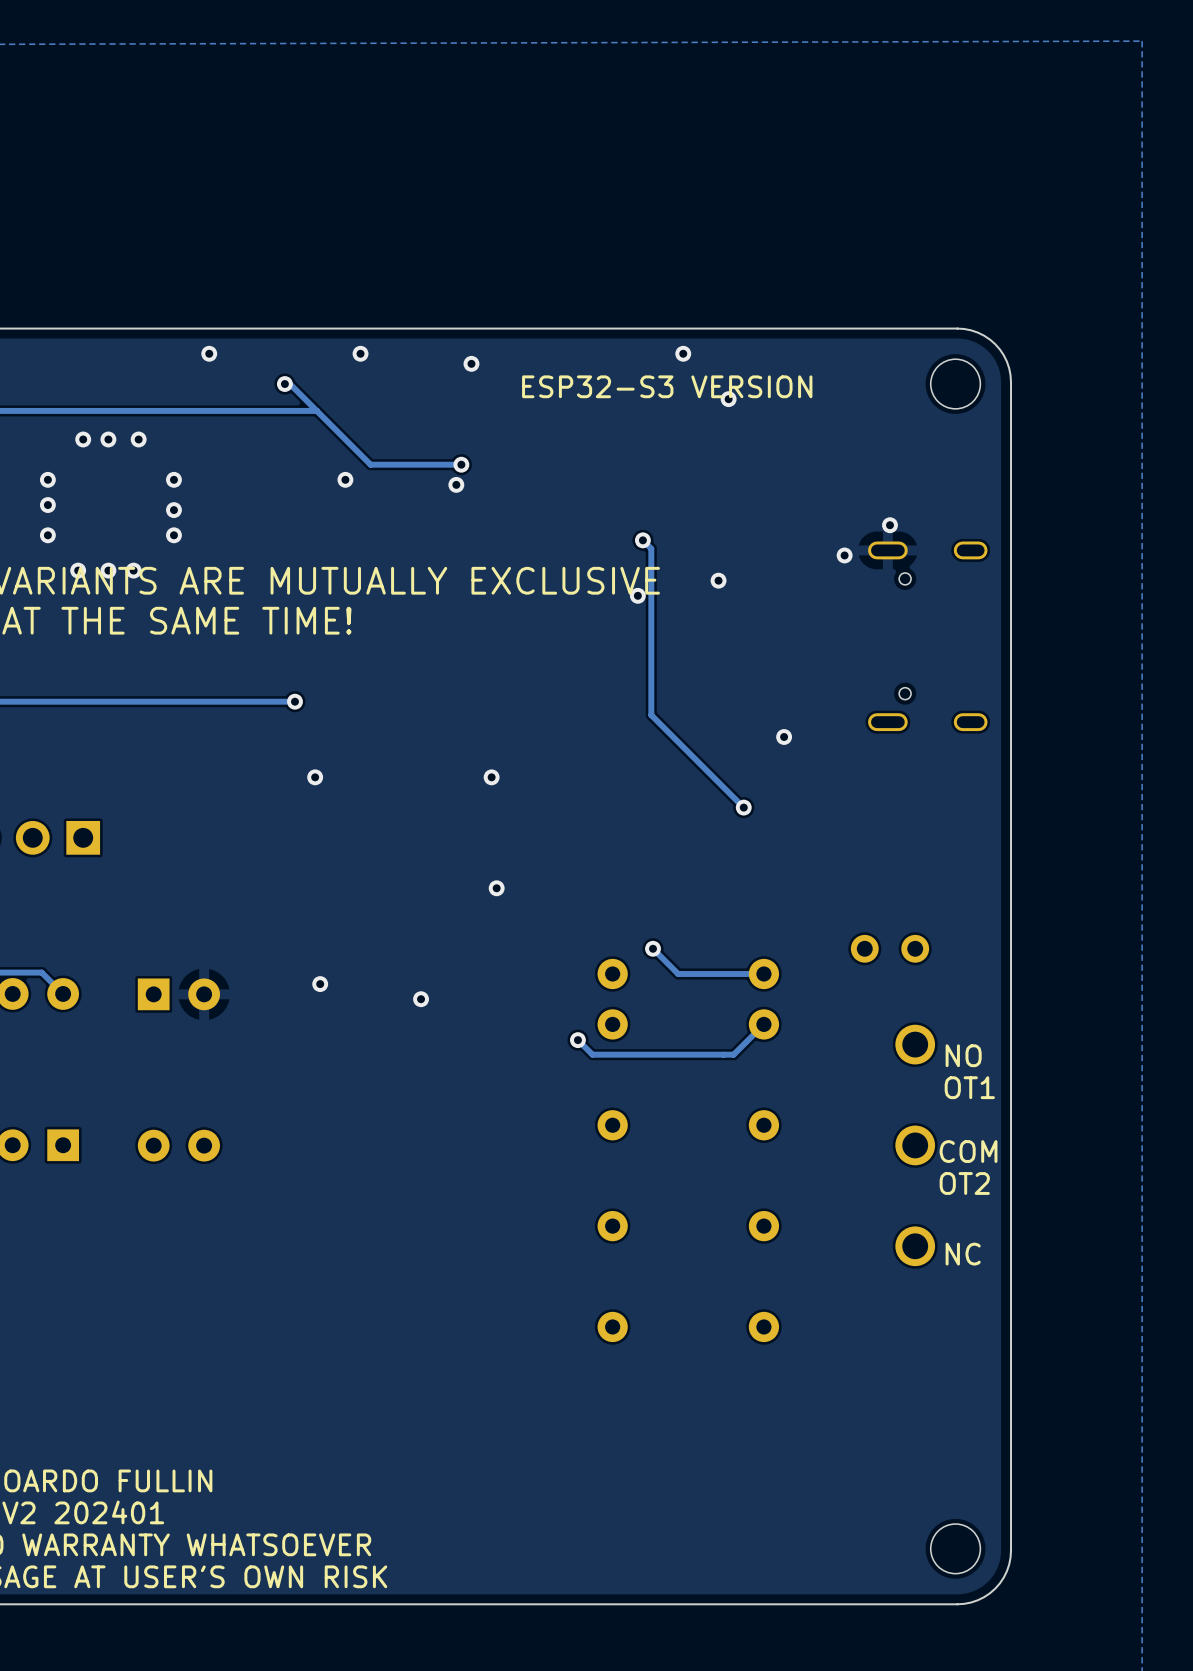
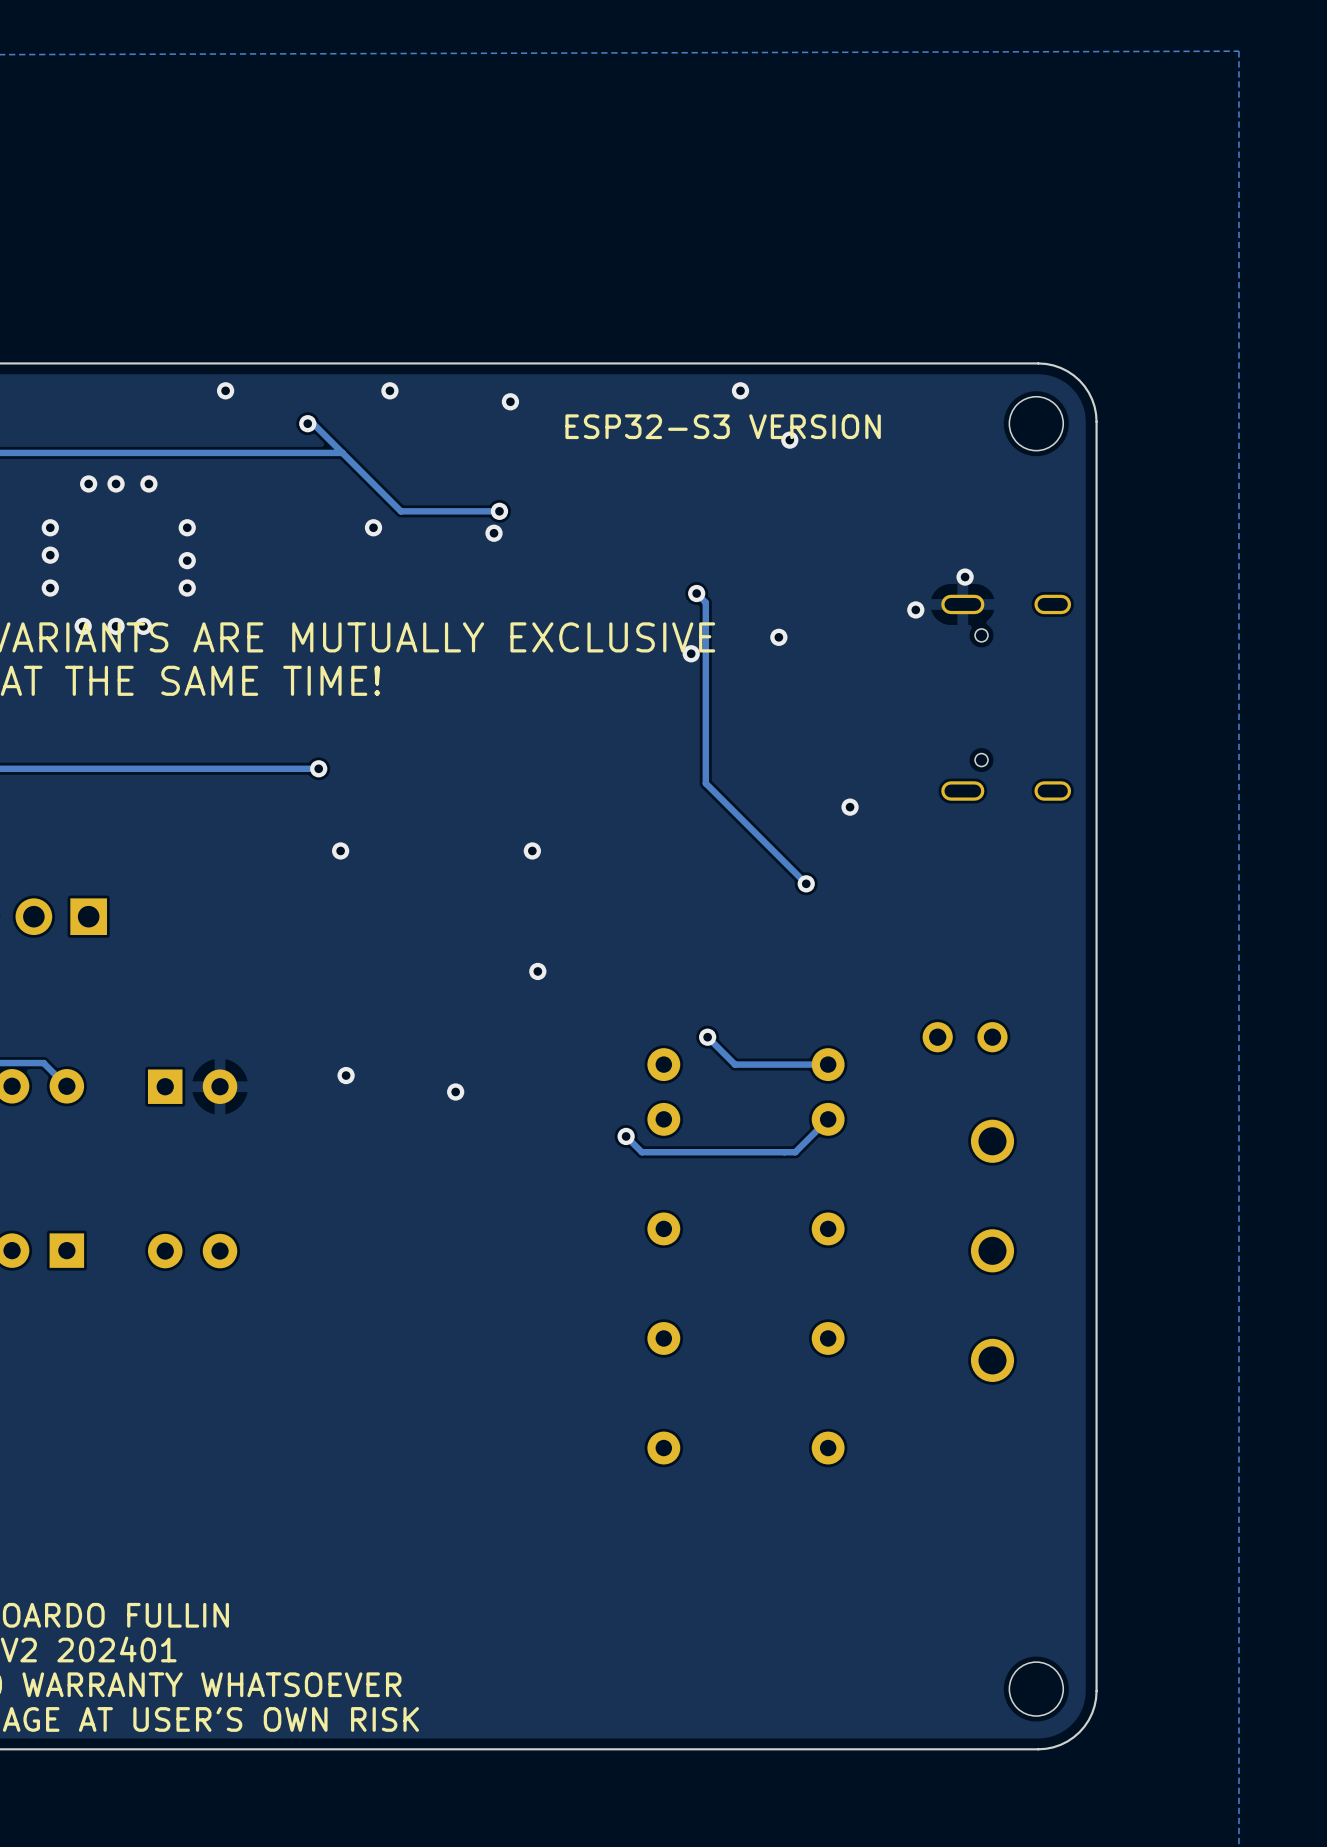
text: NO (963, 1055) -> none
text: OT1 (969, 1087) -> none
text: COM (968, 1151) -> none
text: OT2 (964, 1183) -> none
text: NC (963, 1254) -> none

